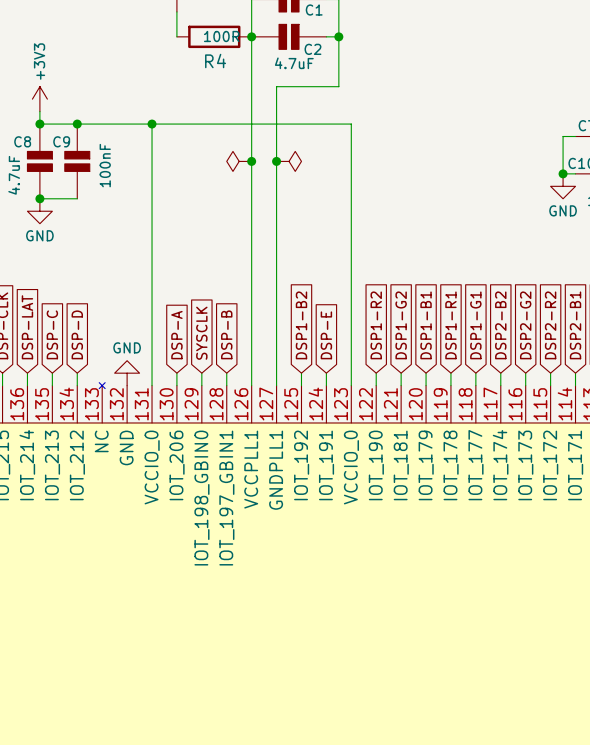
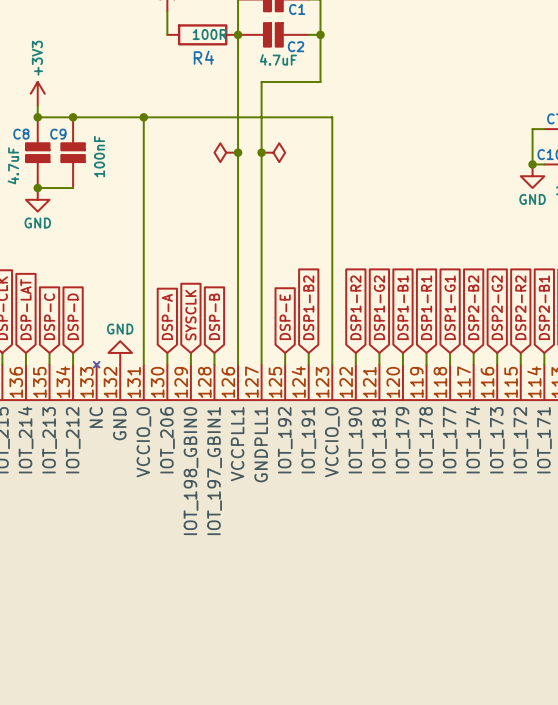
global label: DSP1-B2 (301, 325) -> DSP-E (285, 317)
global label: DSP-E (326, 335) -> DSP1-B2 (308, 307)

